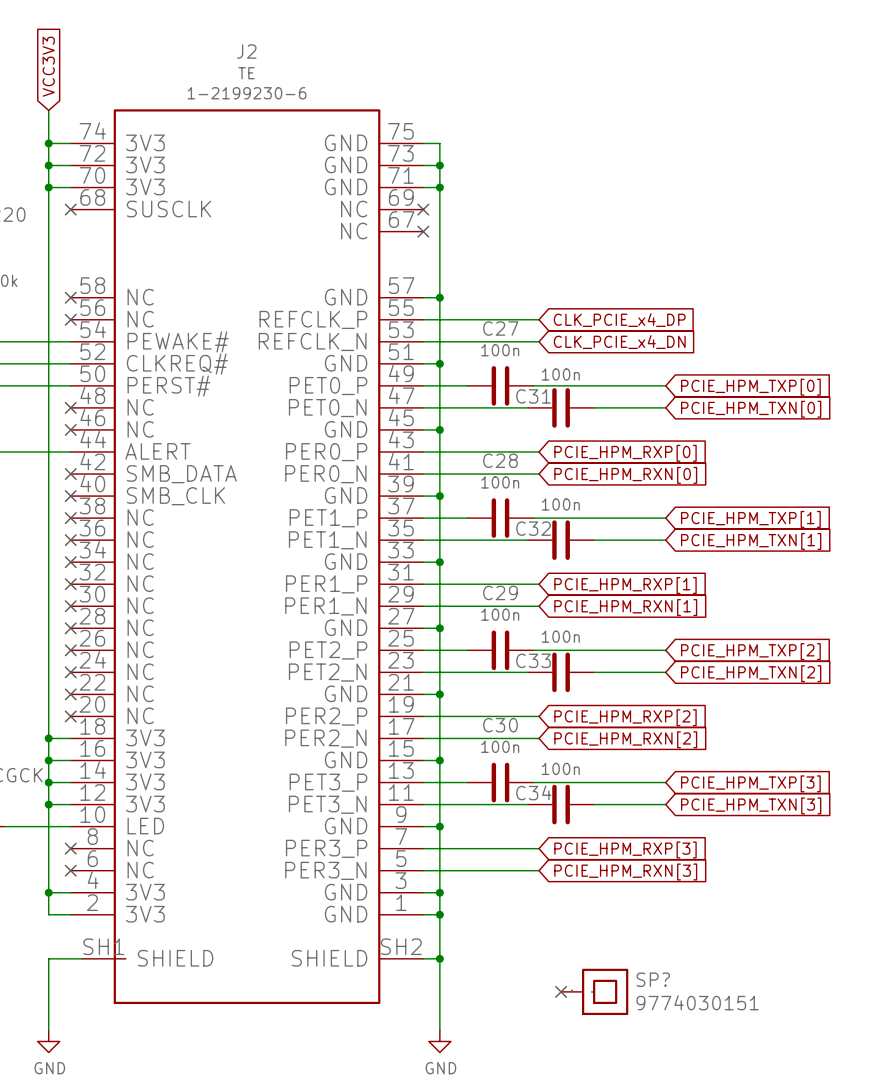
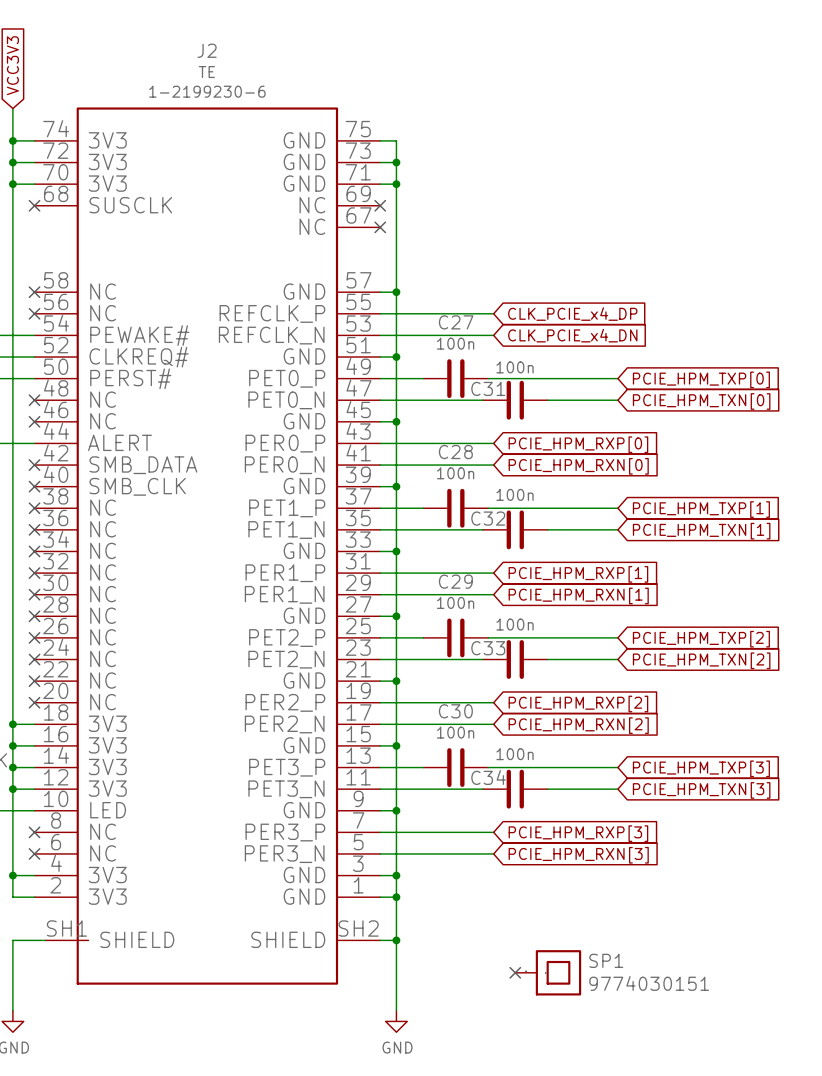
SP? name: SP? (653, 979) -> SP1 (606, 960)

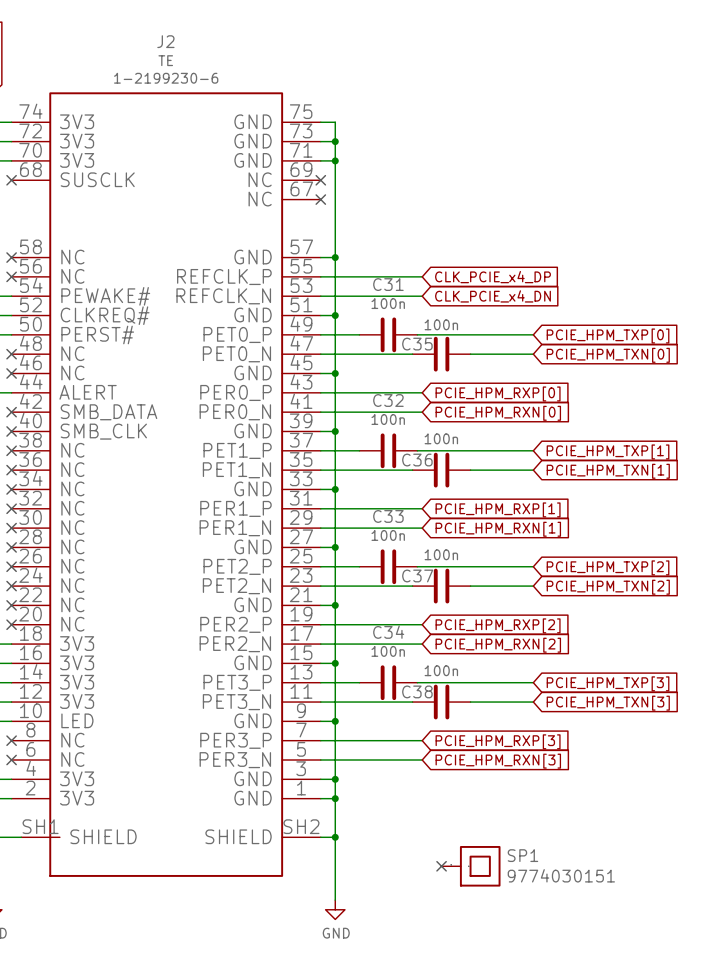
C27 name: C27 (456, 322) -> C31 (388, 284)
C31 name: C31 (488, 388) -> C35 (417, 344)
C28 name: C28 (455, 452) -> C32 (388, 400)
C32 name: C32 (488, 518) -> C36 (417, 460)
C29 name: C29 (455, 581) -> C33 (388, 516)
C33 name: C33 (488, 648) -> C37 (417, 575)
C30 name: C30 (455, 711) -> C34 (388, 632)
C34 name: C34 (488, 777) -> C38 (417, 691)

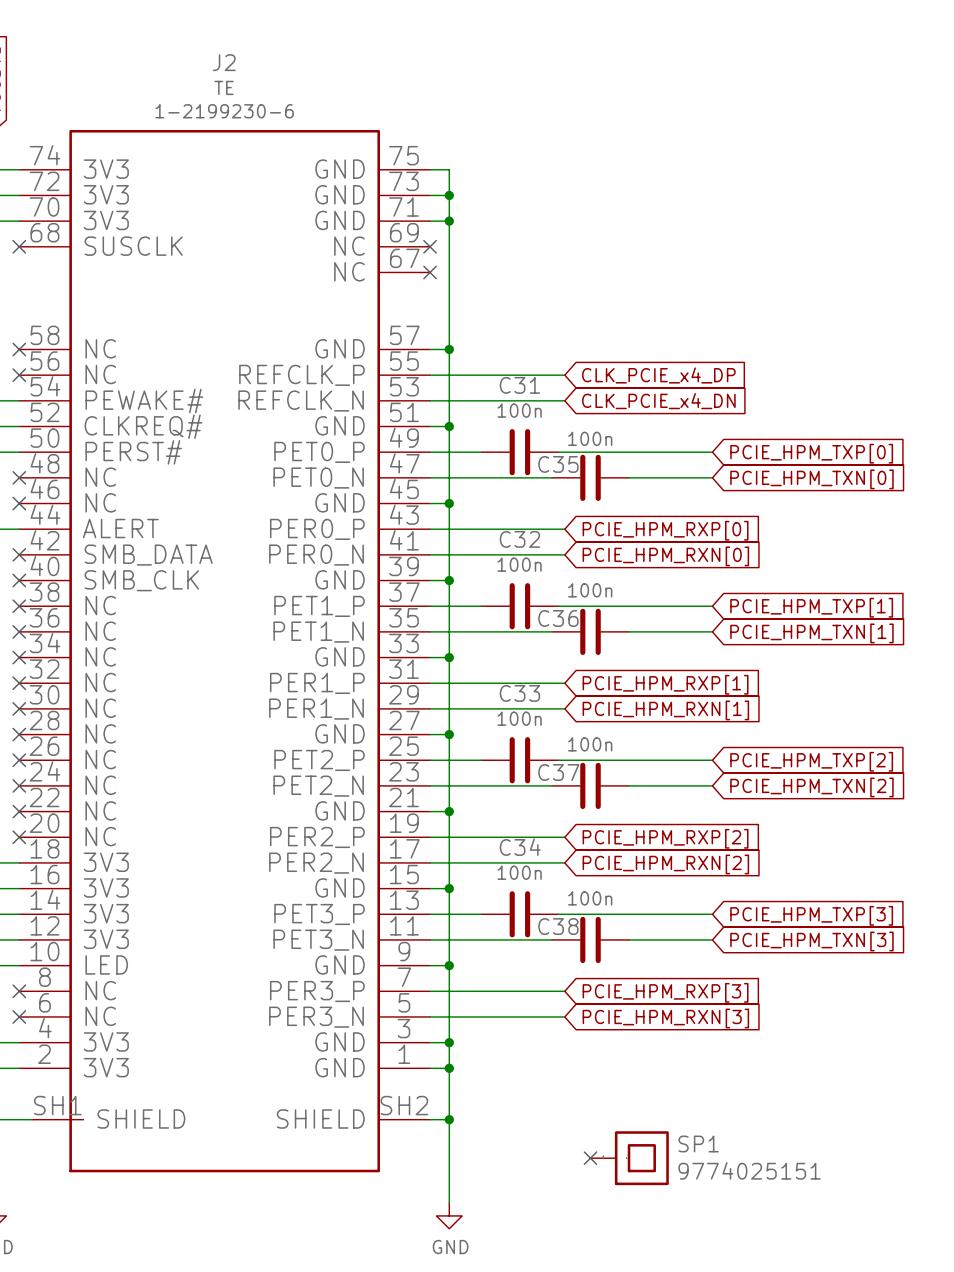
SP1 value: 9774030151 (561, 875) -> 9774025151 (749, 1170)

